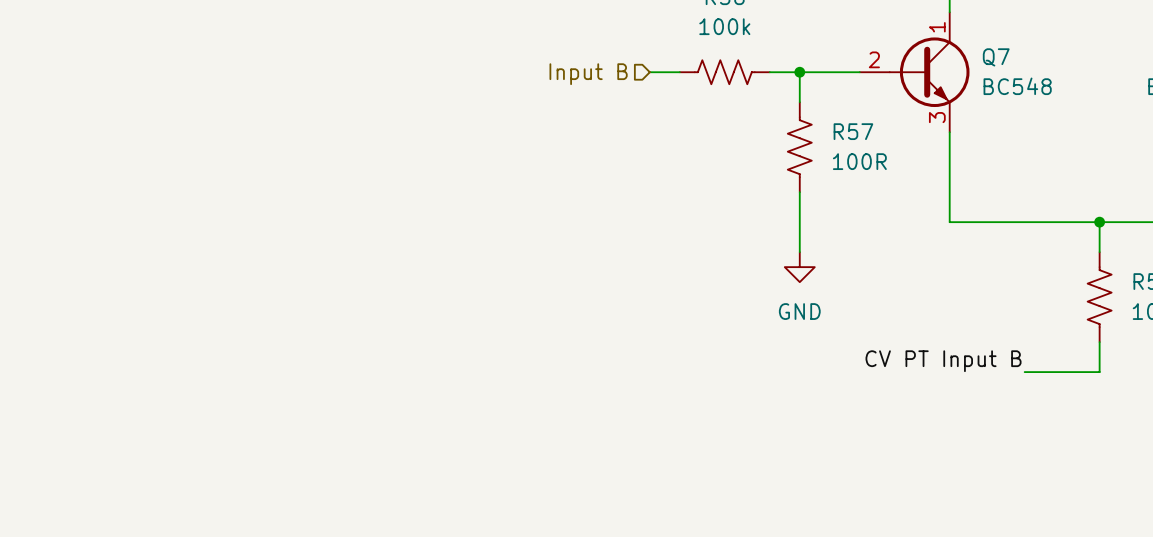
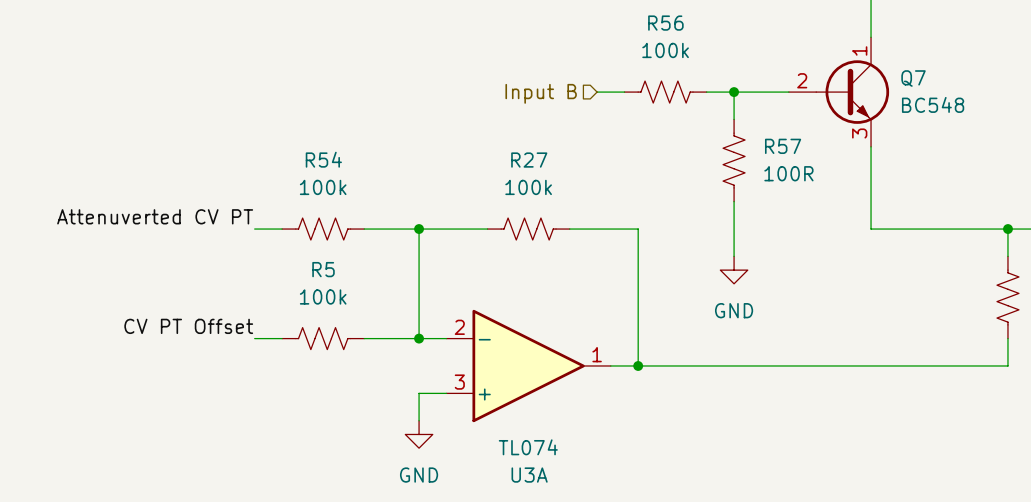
label: none -> Attenuverted CV PT (155, 216)
wire: none -> (254, 229) (282, 229)
R54: none -> 100k (323, 229)
wire: none -> (364, 229) (487, 229)
wire: none -> (419, 229) (419, 338)
junction: none -> (419, 229)
R27: none -> 100k (528, 229)
wire: none -> (569, 229) (638, 229) (638, 365)
label: none -> CV PT Offset (188, 326)
wire: none -> (254, 338) (282, 338)
R5: none -> 100k (323, 338)
wire: none -> (364, 338) (446, 338)
junction: none -> (419, 338)
label: CV PT Input B (943, 361) -> none
U3A: none -> TL074 (528, 365)
wire: none -> (610, 365) (939, 365)
junction: none -> (638, 365)
wire: none -> (446, 393) (419, 393) (419, 420)
power symbol: none -> GND (419, 434)

